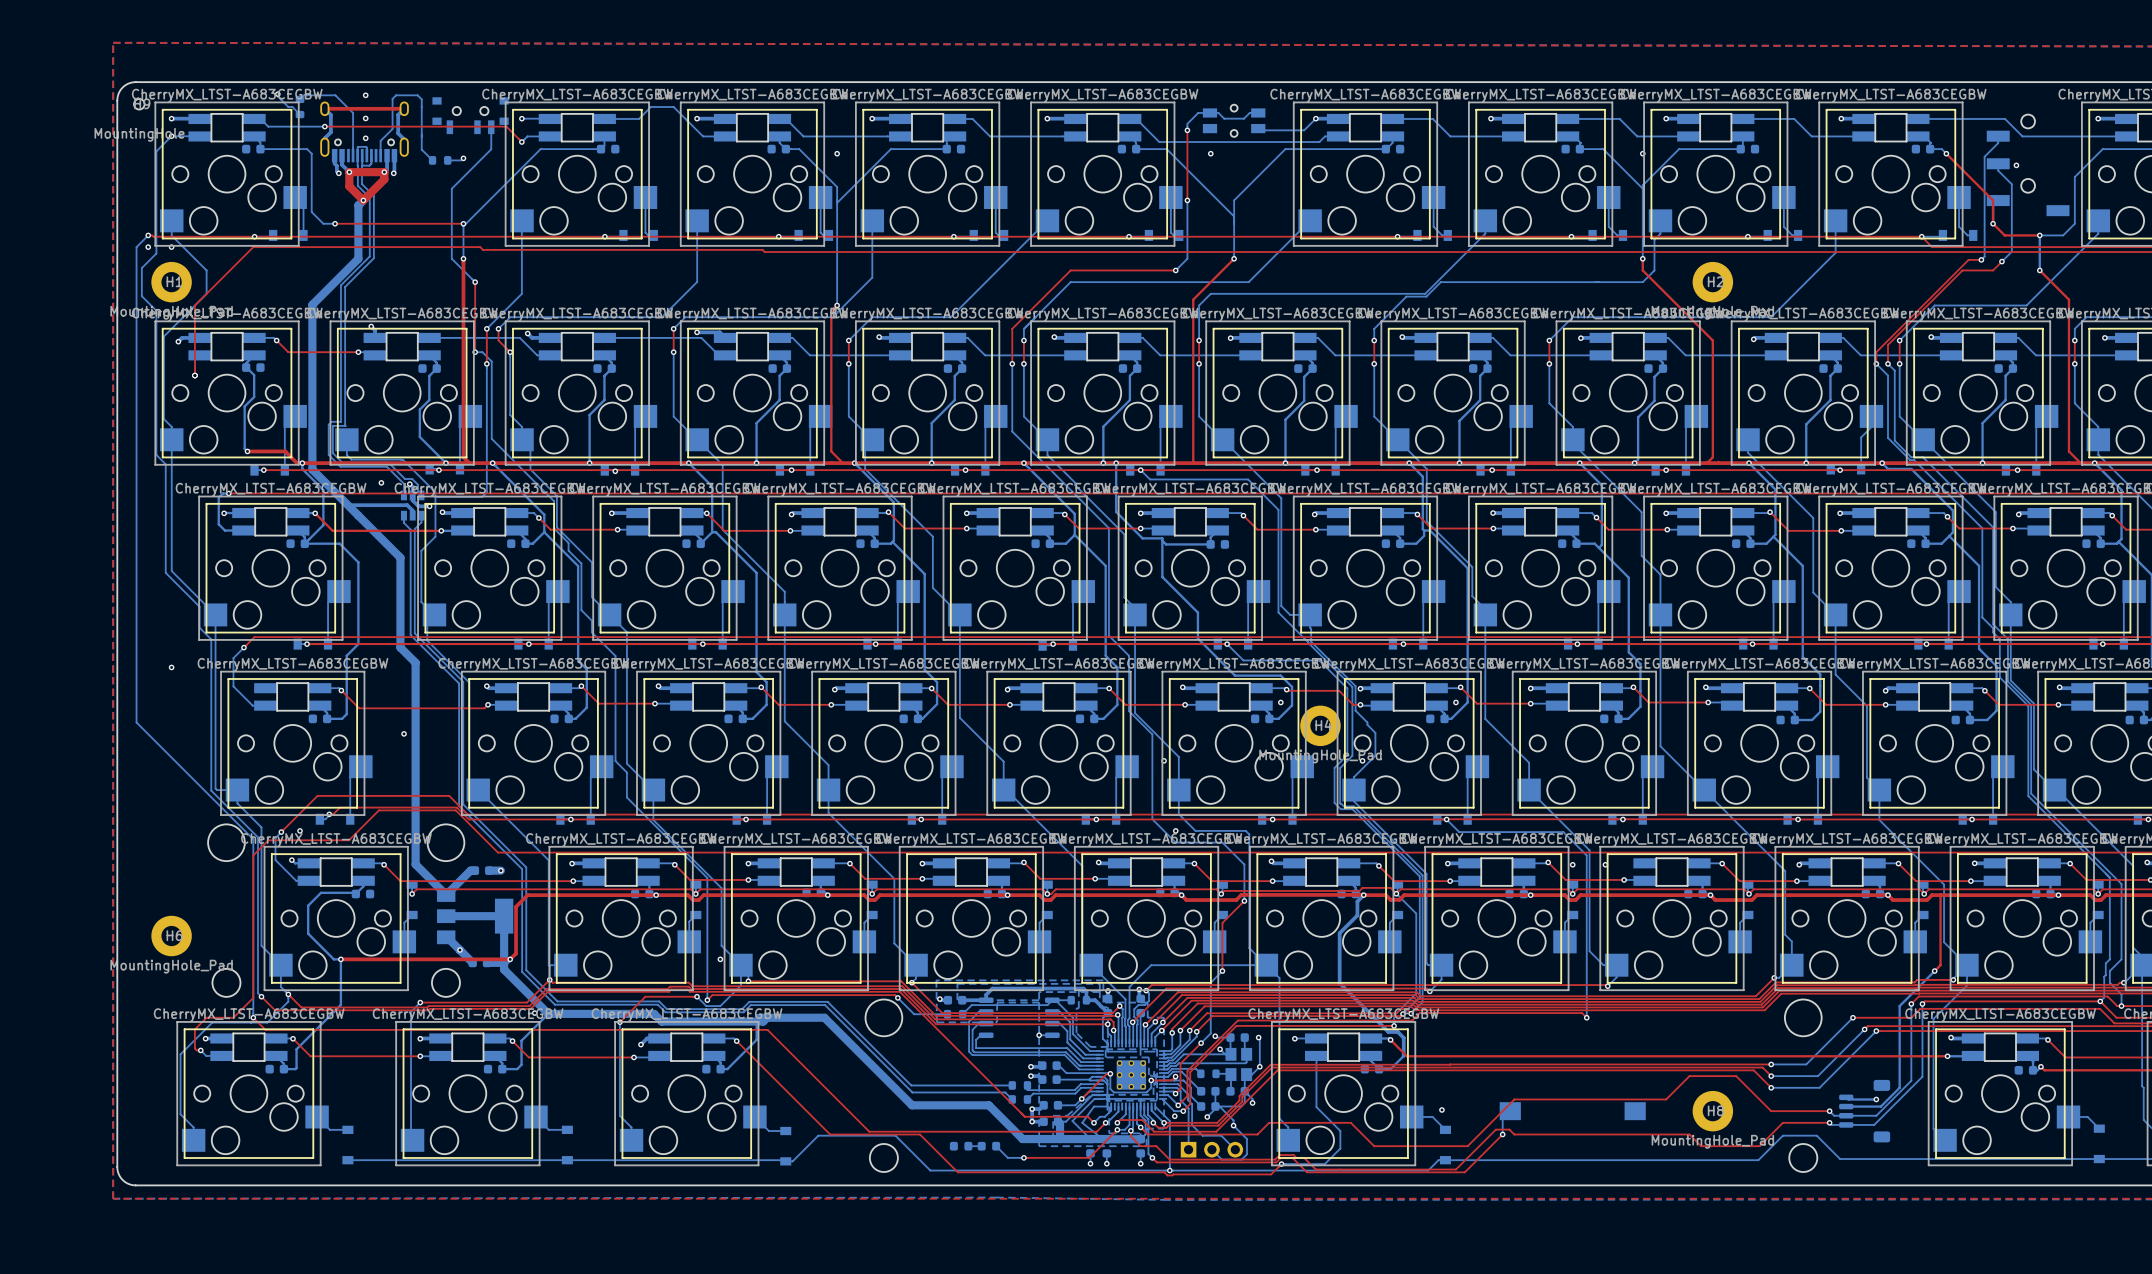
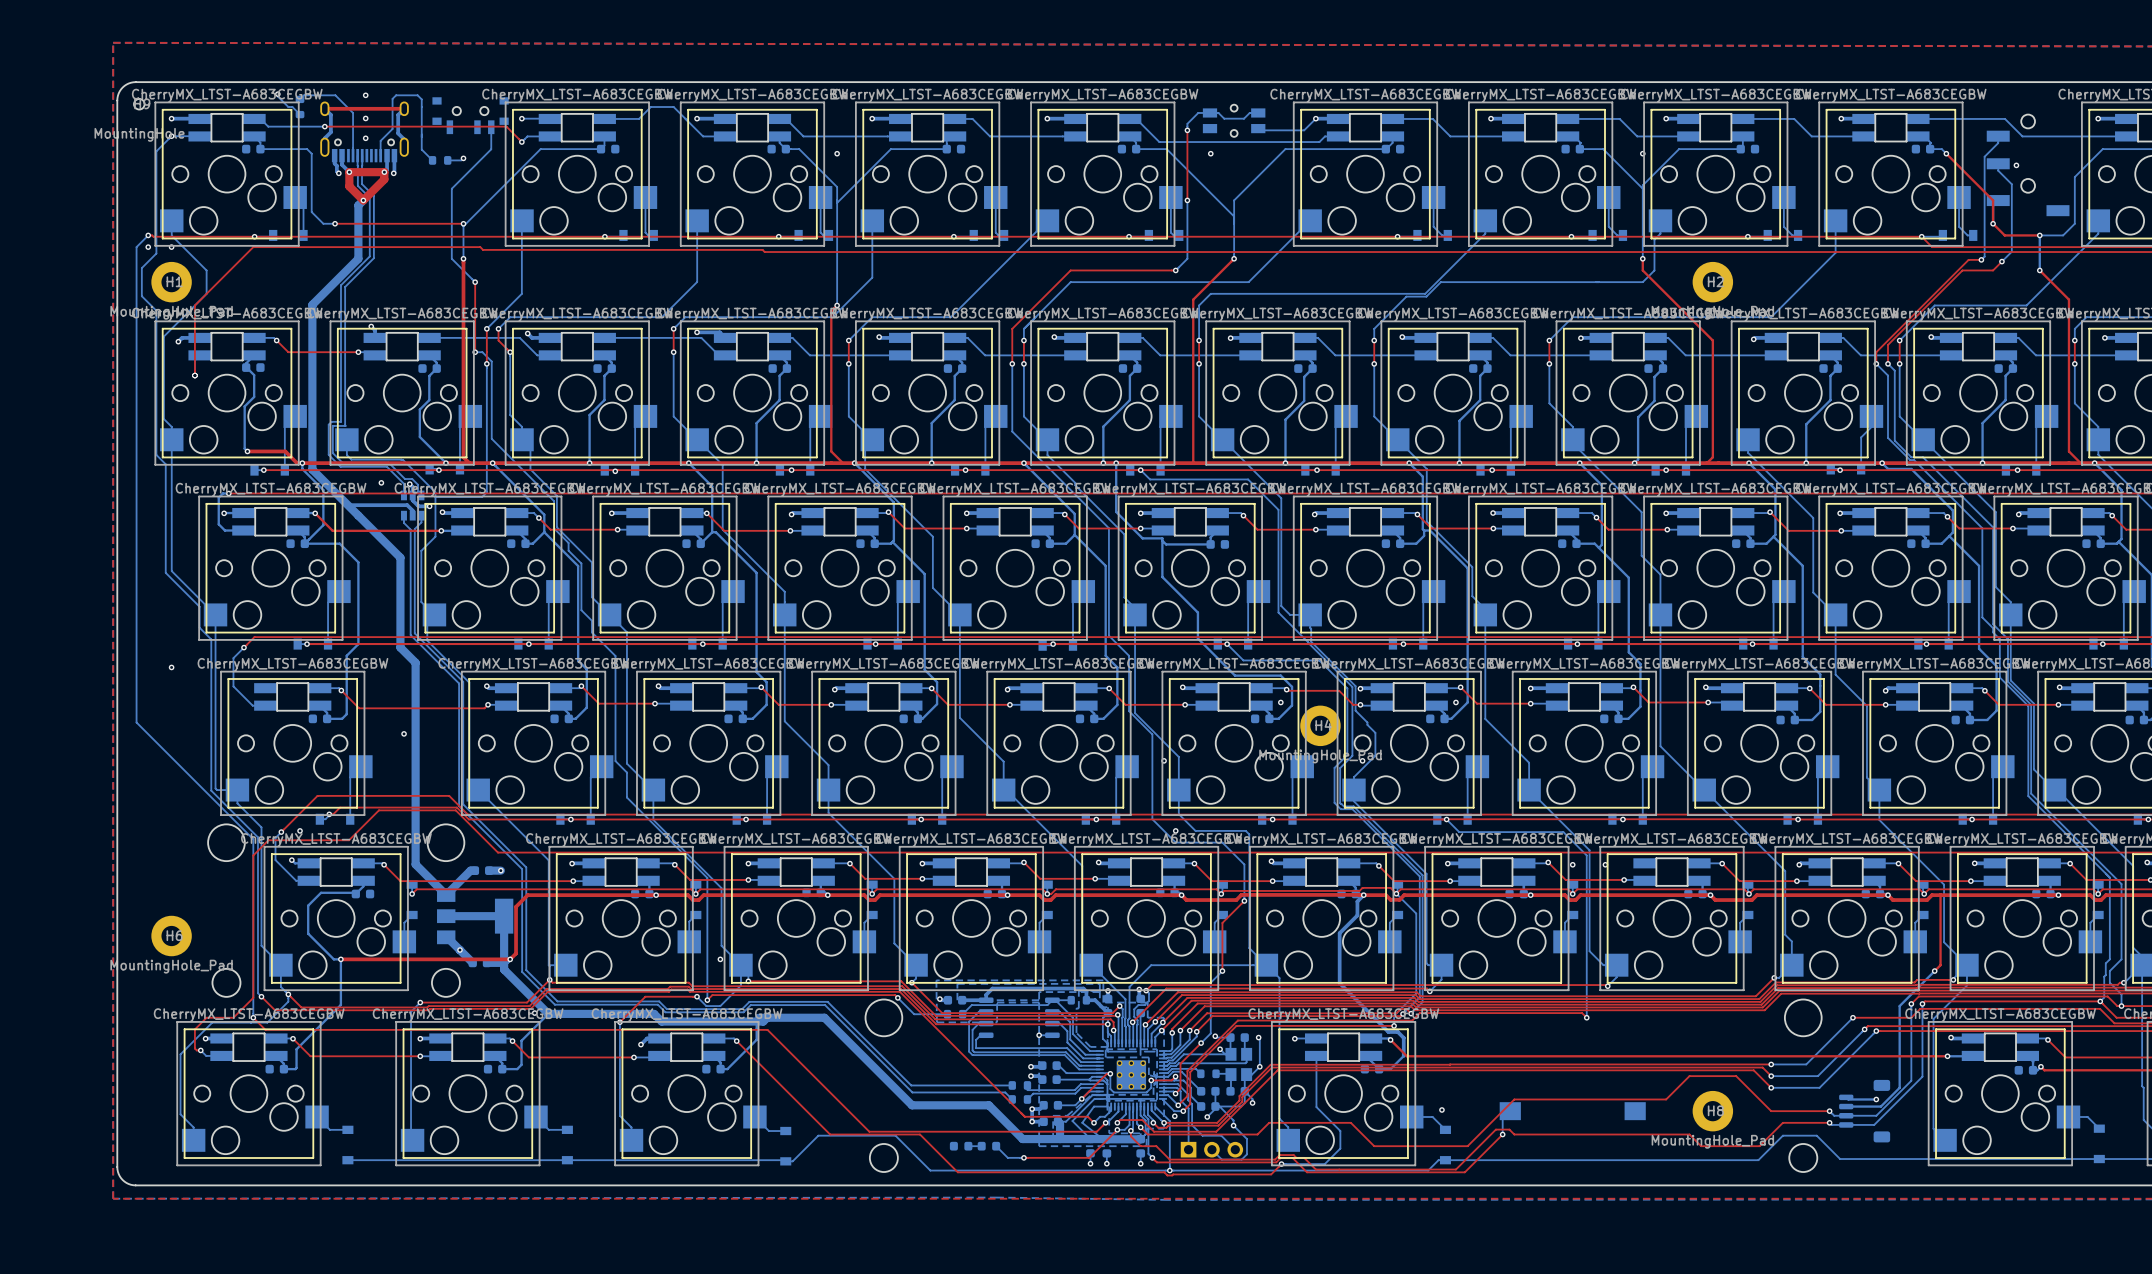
bottom track: (357, 155) (358, 146) (366, 147) (366, 155) -> none
bottom track: (371, 155) (371, 163) (362, 165) -> none

